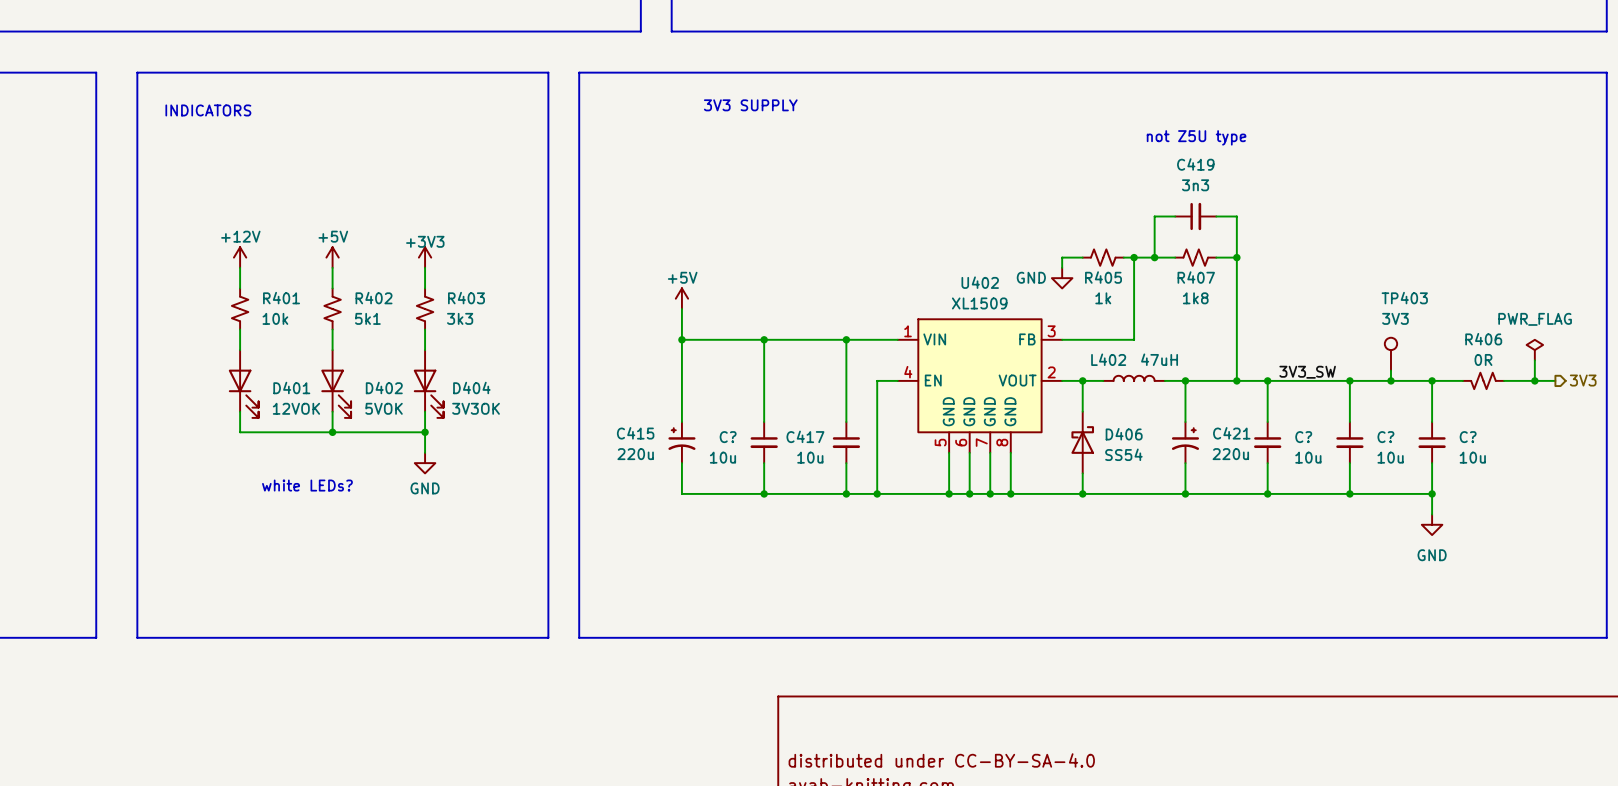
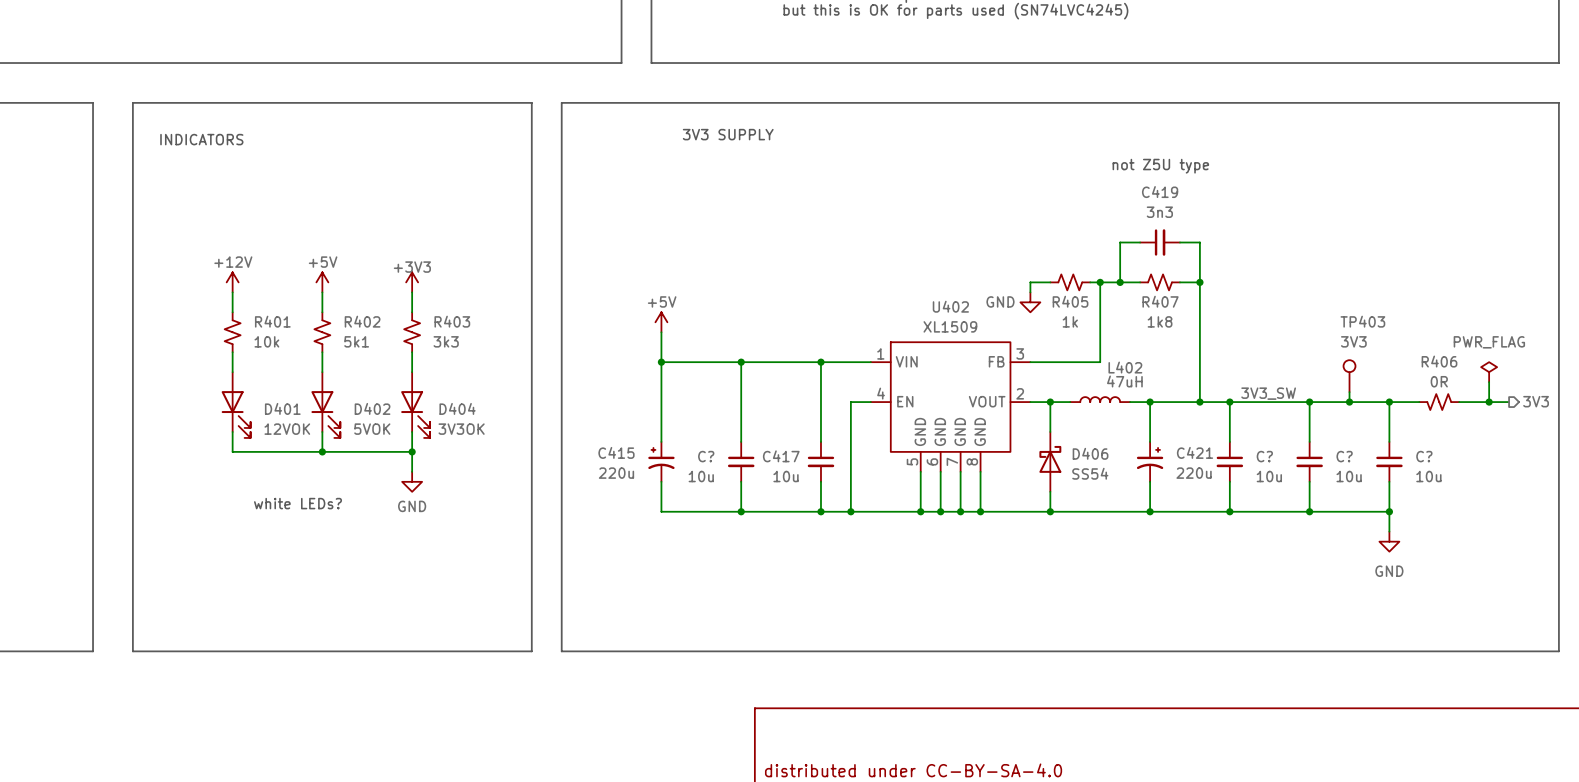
L402 name position: L402 (1108, 359) -> L402 (1125, 367)

